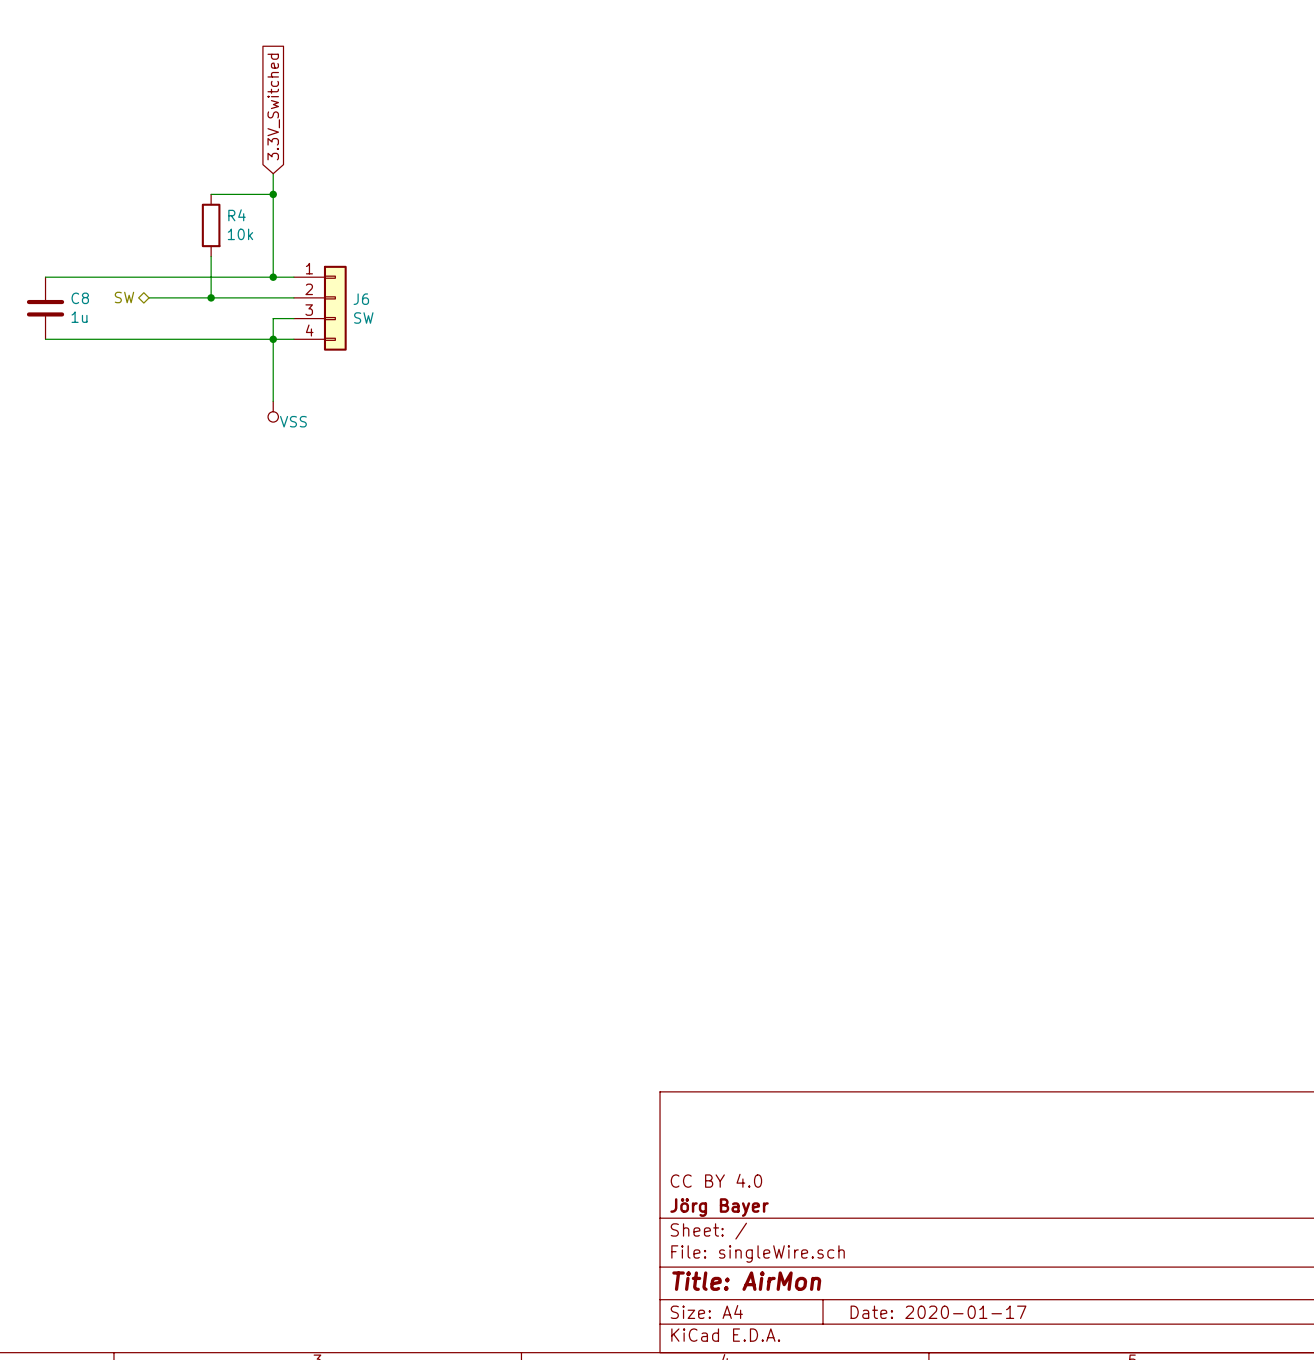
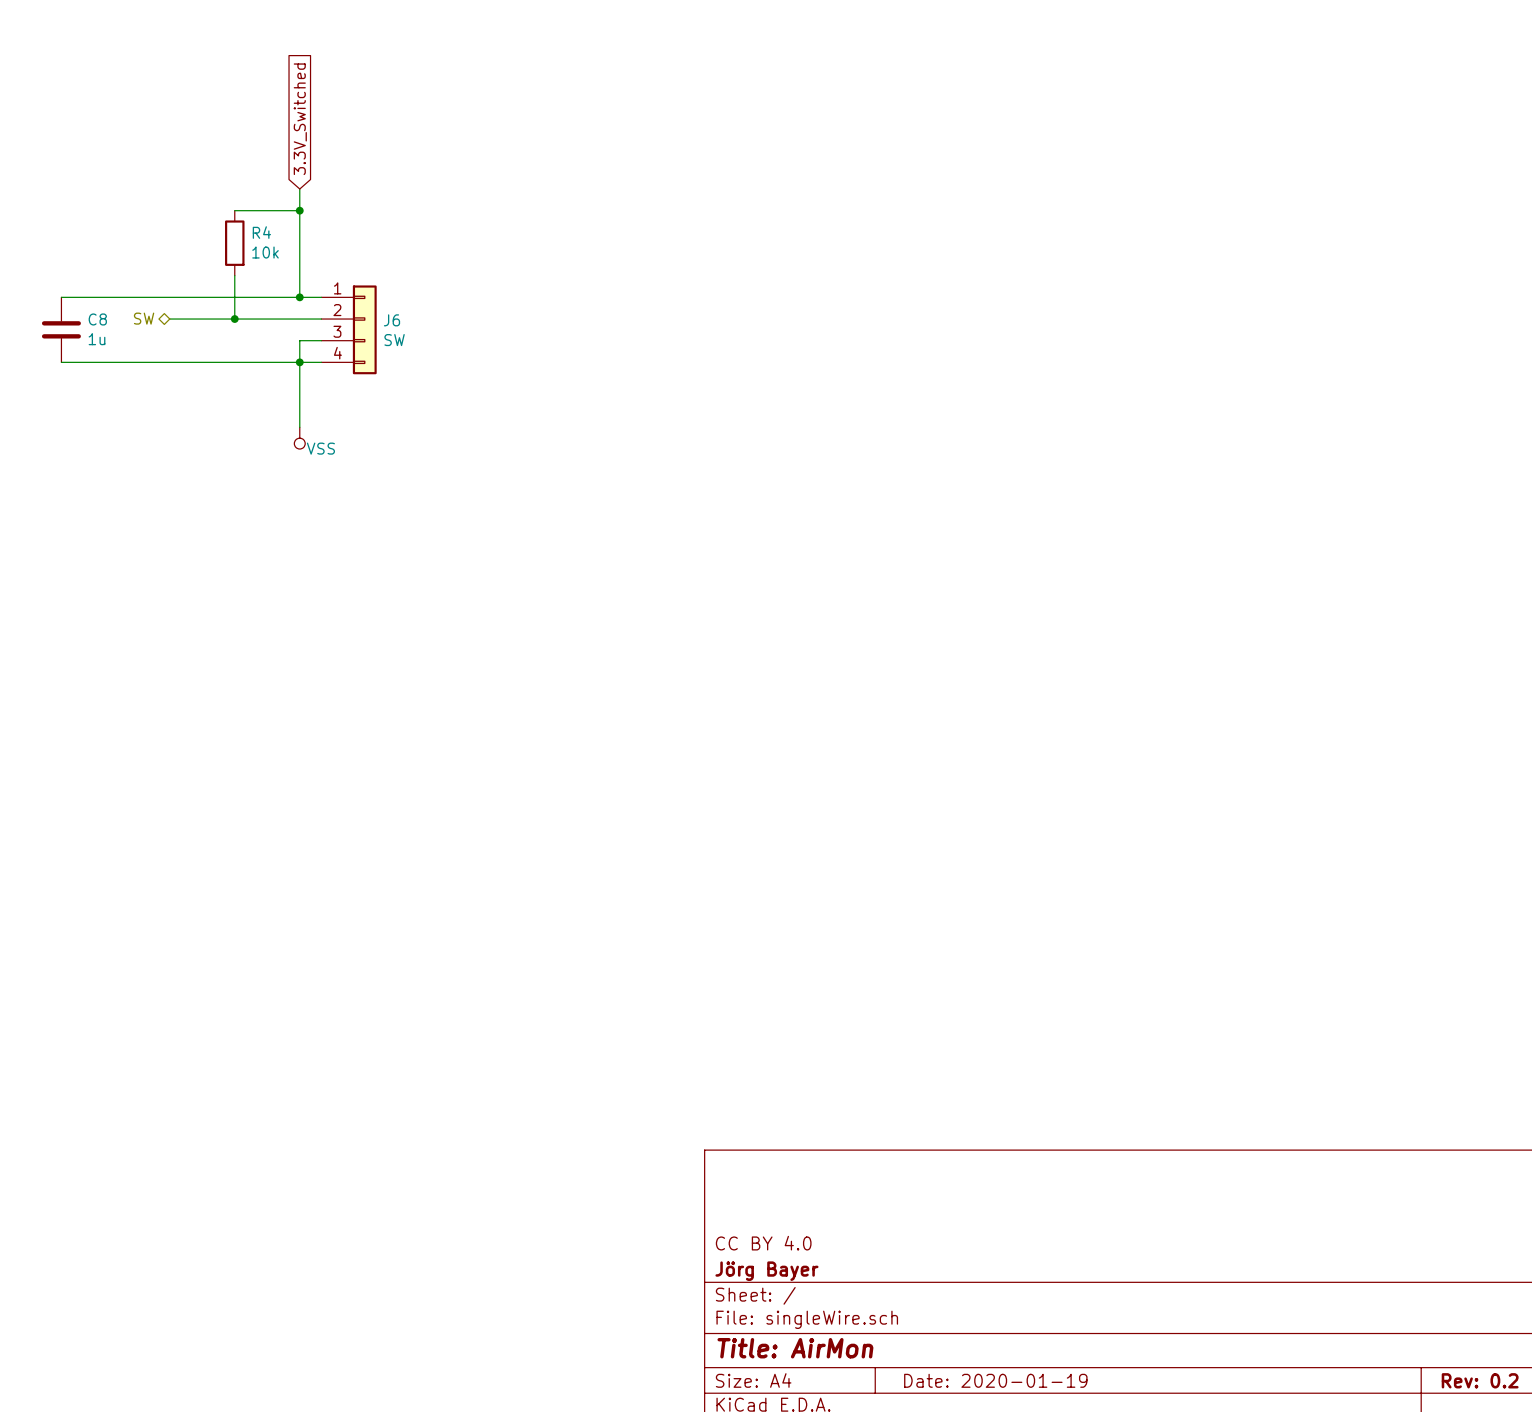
title block: Date: 2020-01-17 (938, 1312) -> Date: 2020-01-19 (995, 1380)

